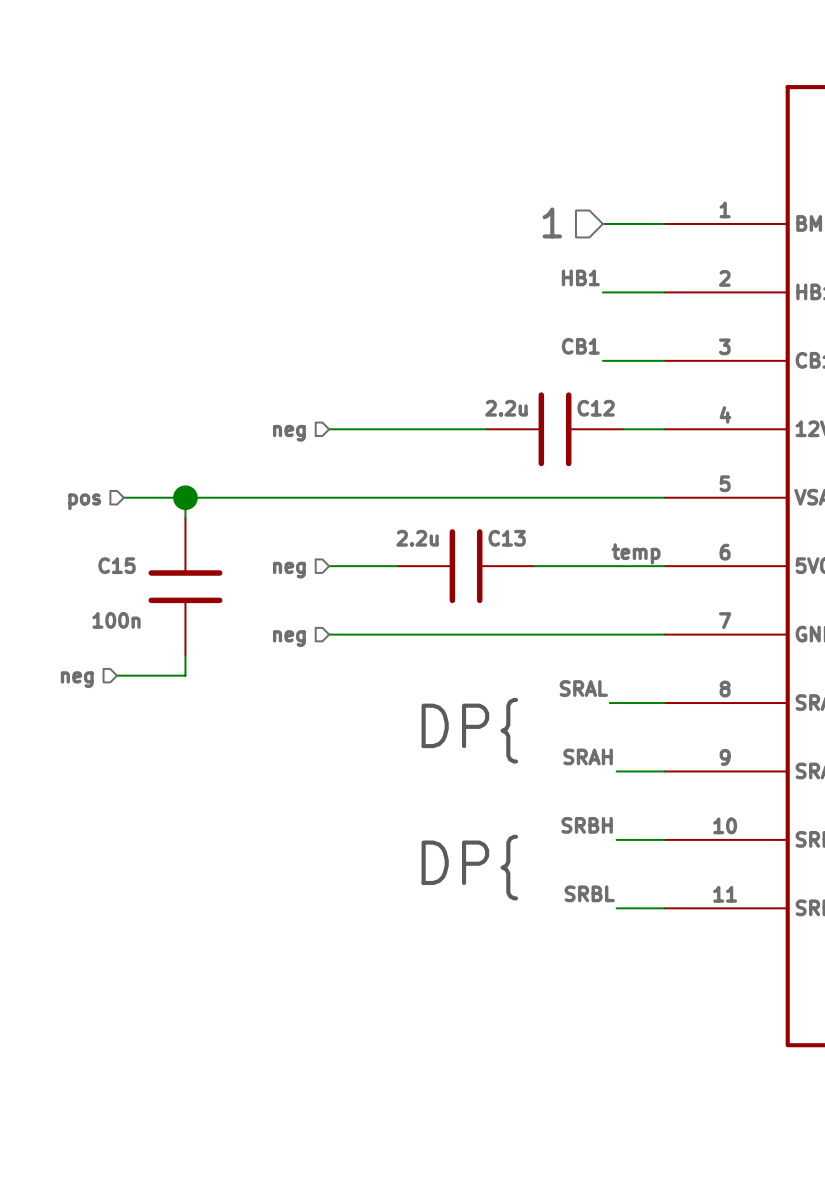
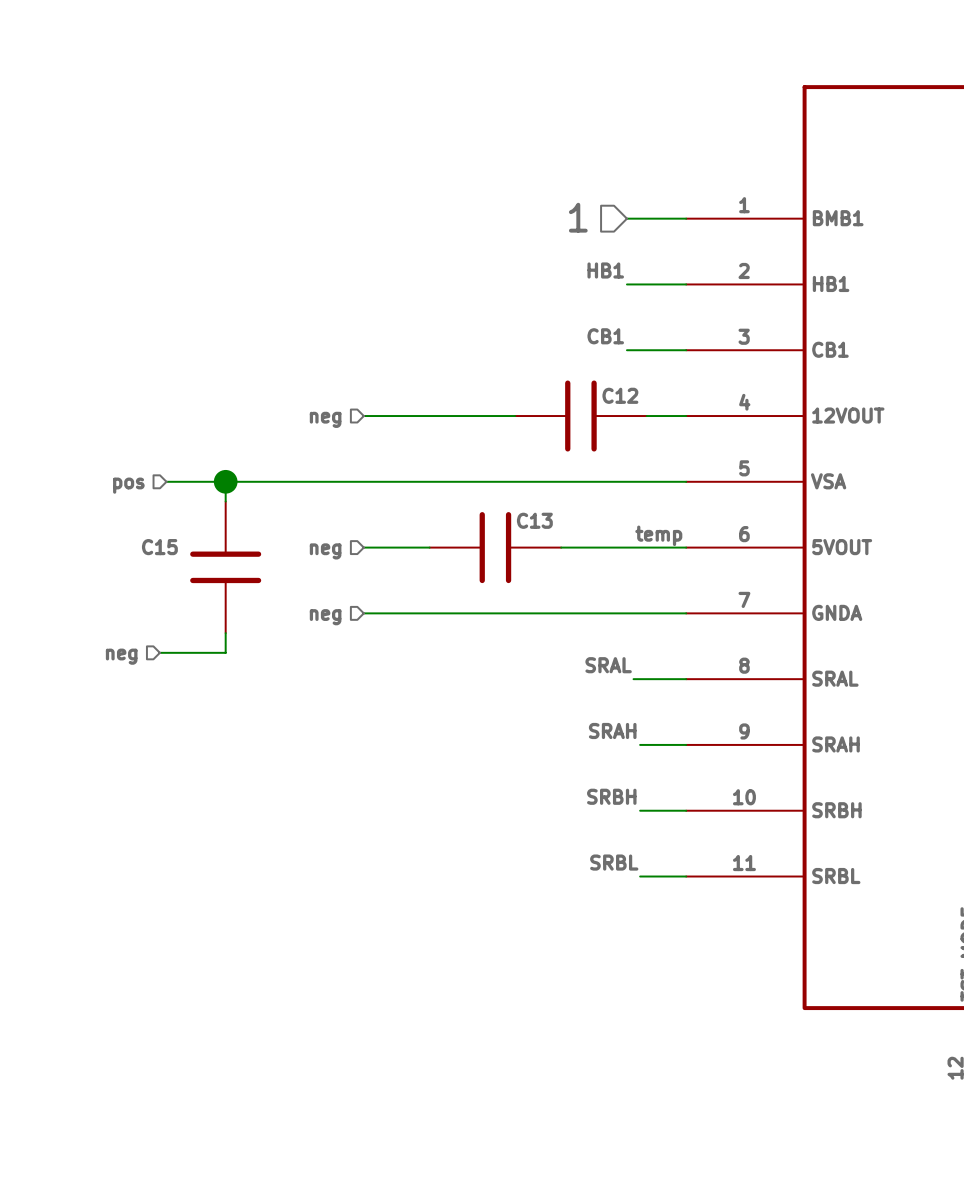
C12 value: 2.2u (506, 408) -> none
C13 value: 2.2u (417, 538) -> none
C15 value: 100n (116, 620) -> none
text: DP{ (469, 730) -> none
text: DP{ (469, 867) -> none

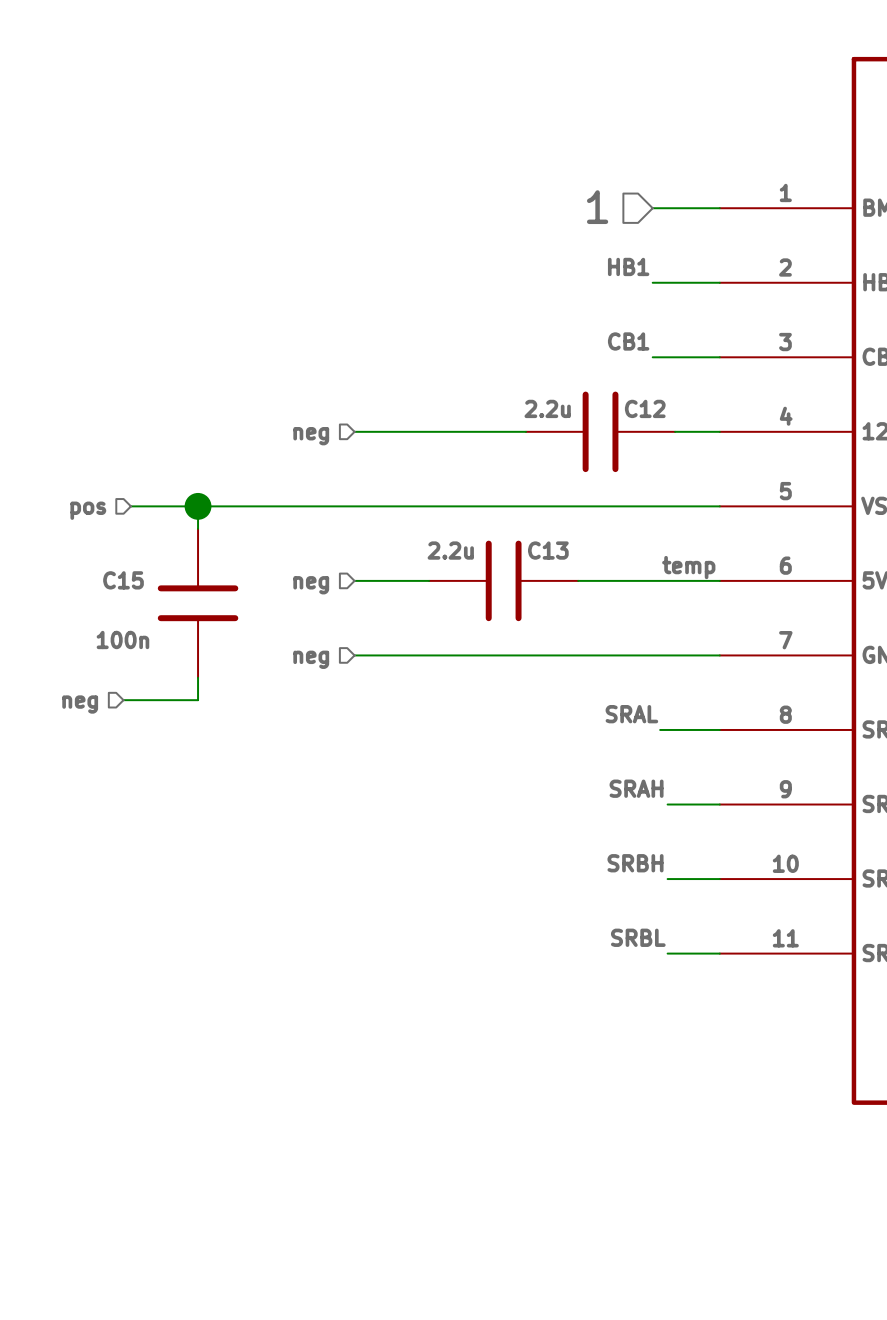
C12 value: none -> 2.2u (547, 408)
C13 value: none -> 2.2u (450, 550)
C15 value: none -> 100n (122, 639)

